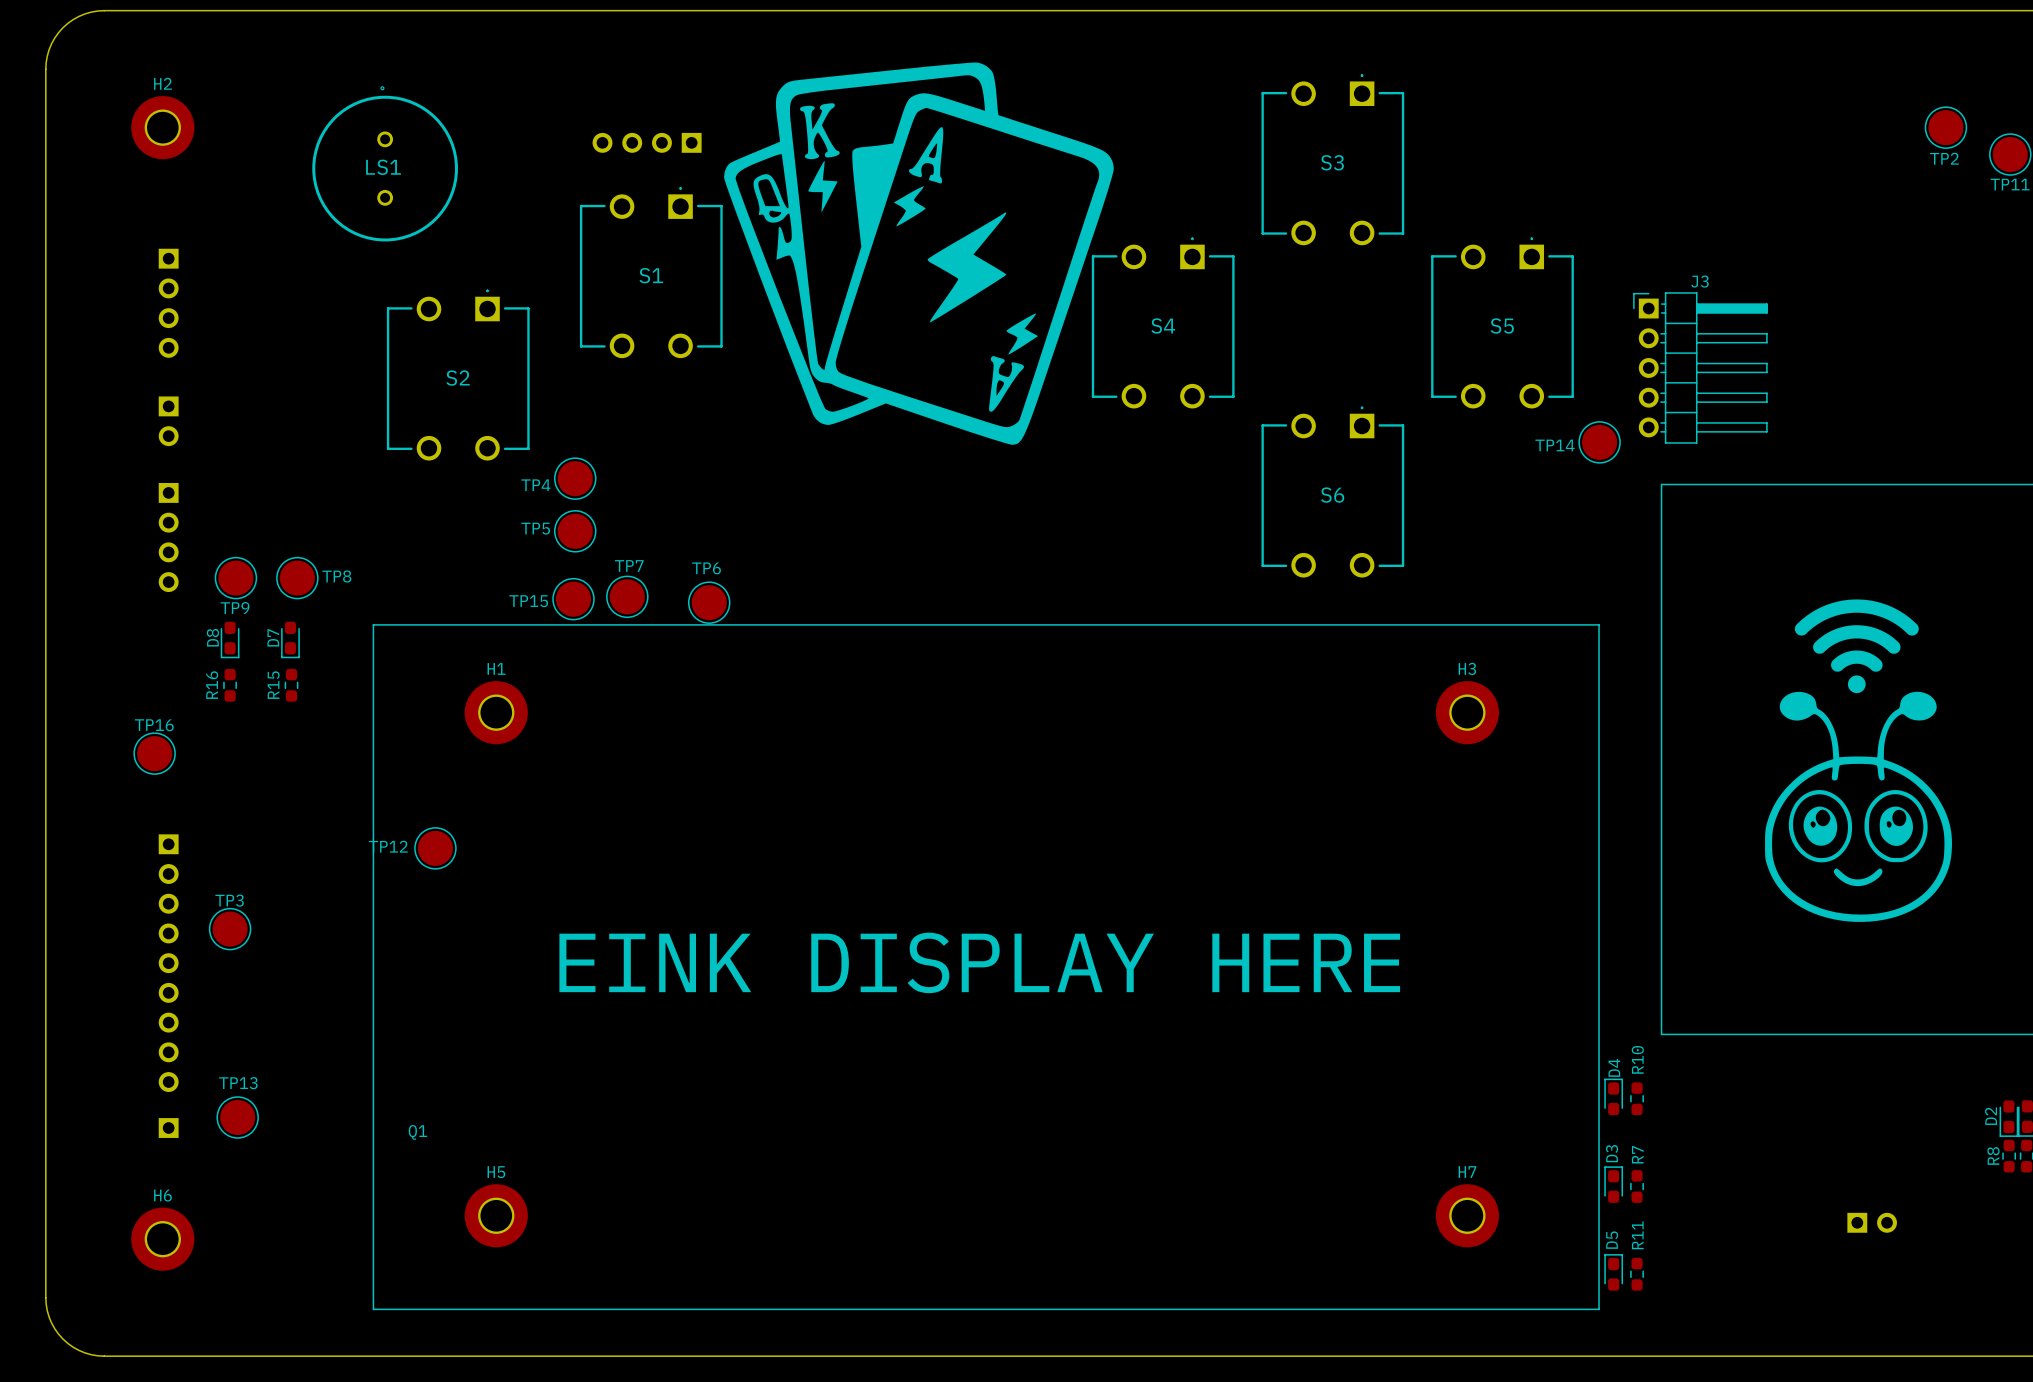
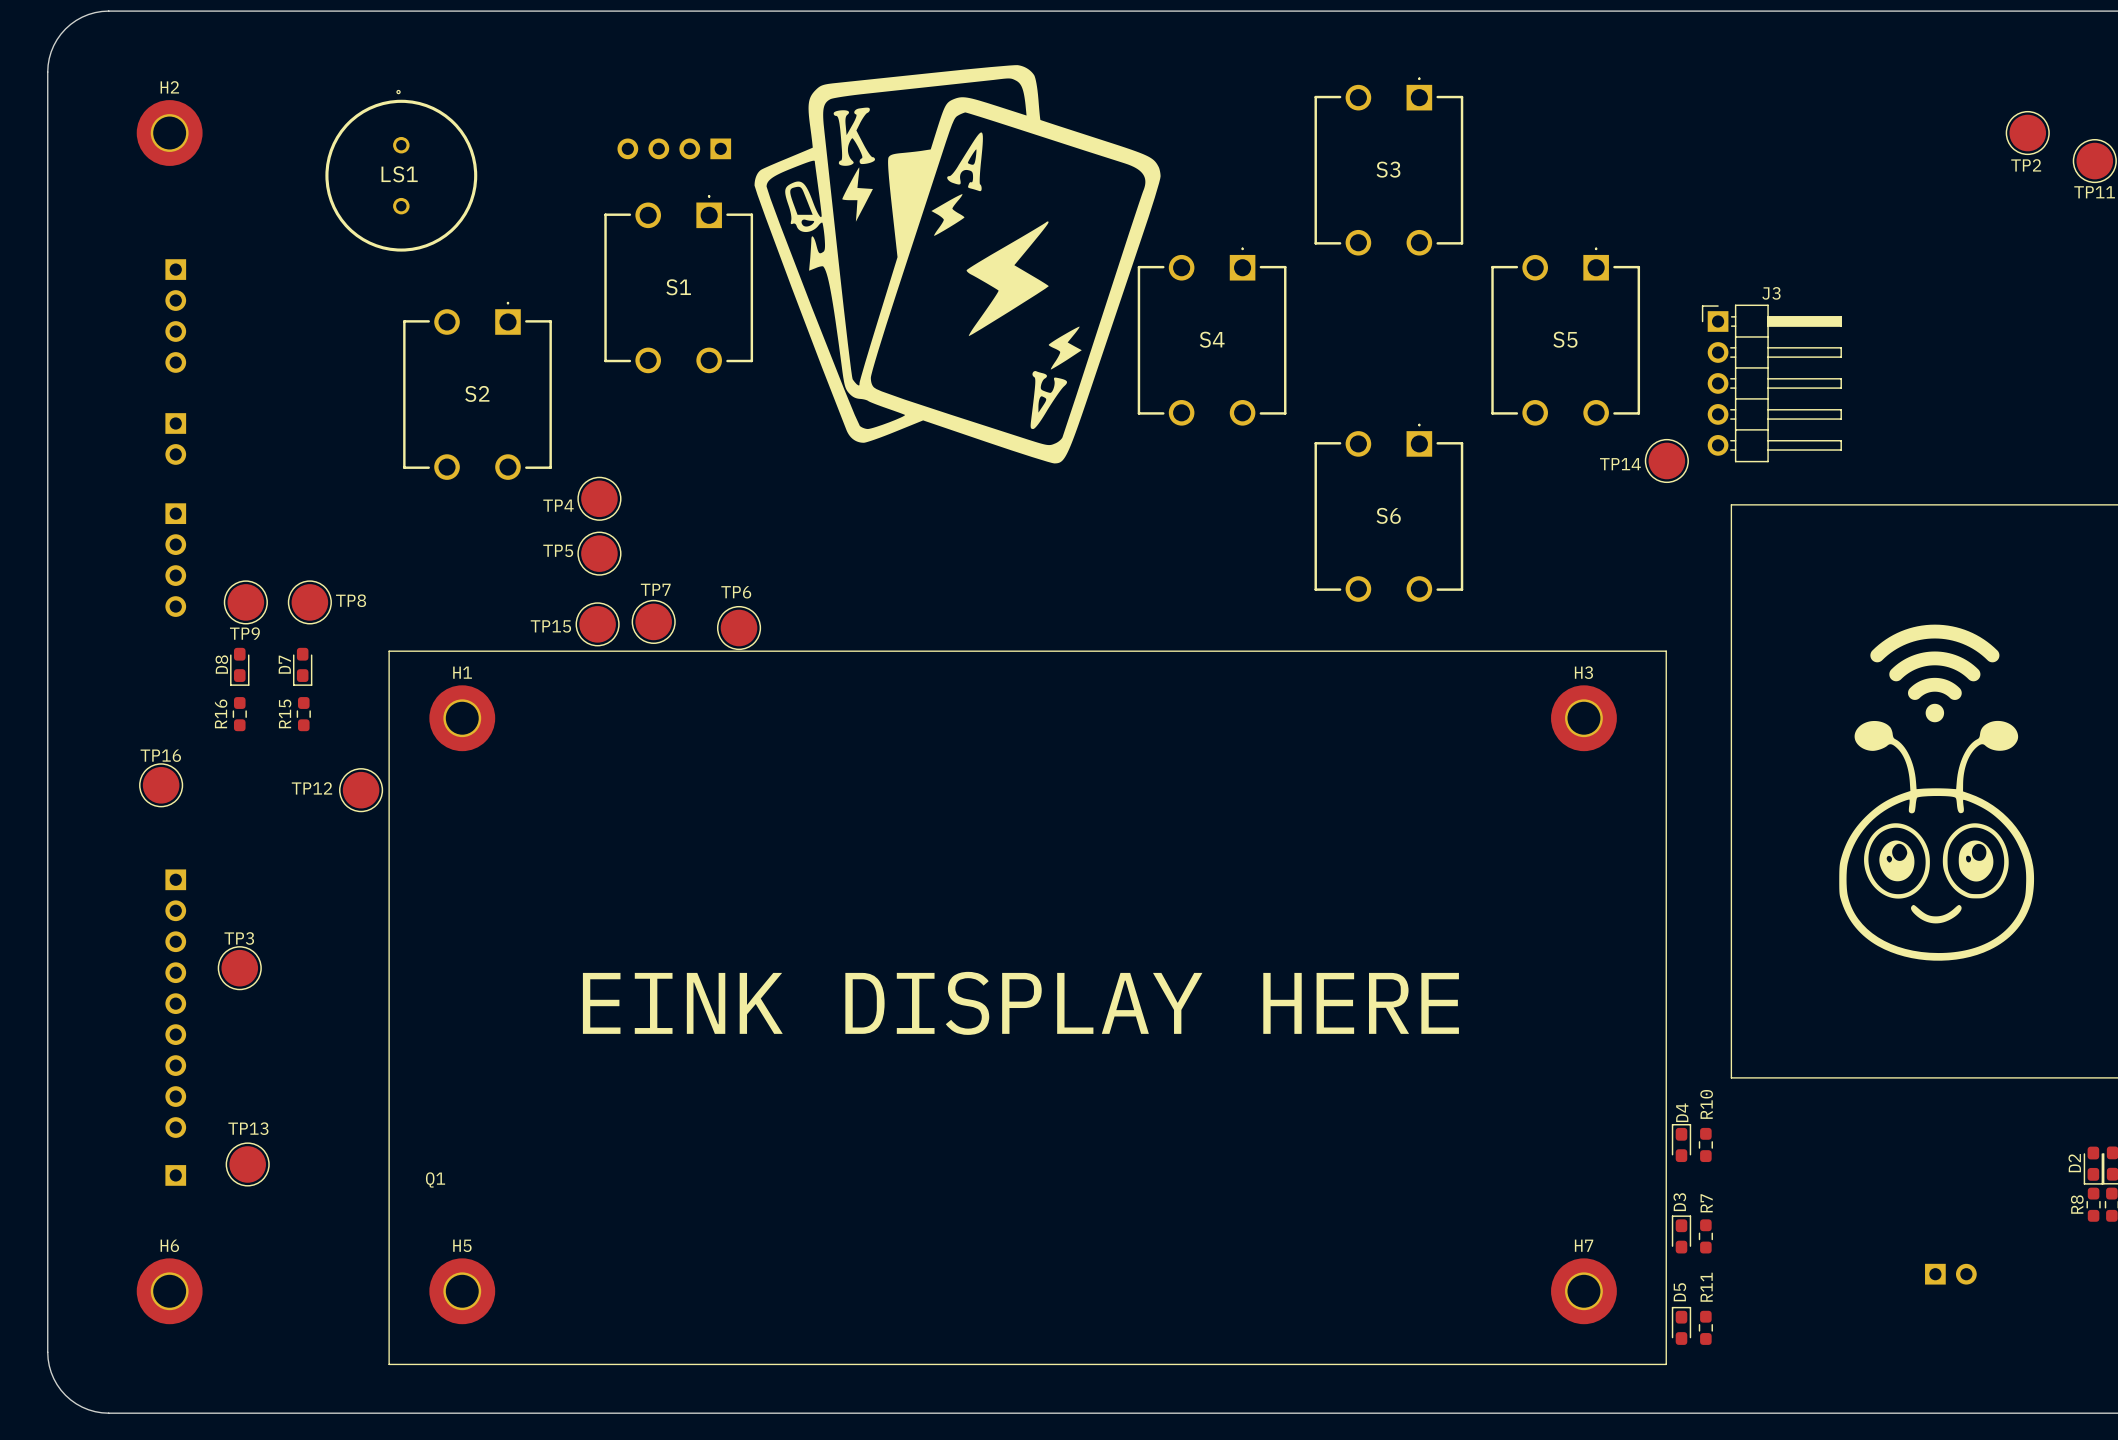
H1 position: (496, 712) -> (462, 718)
H3 position: (1467, 712) -> (1583, 718)
TP12 position: (435, 848) -> (361, 790)
H5 position: (496, 1215) -> (462, 1291)
H7 position: (1467, 1215) -> (1583, 1291)

